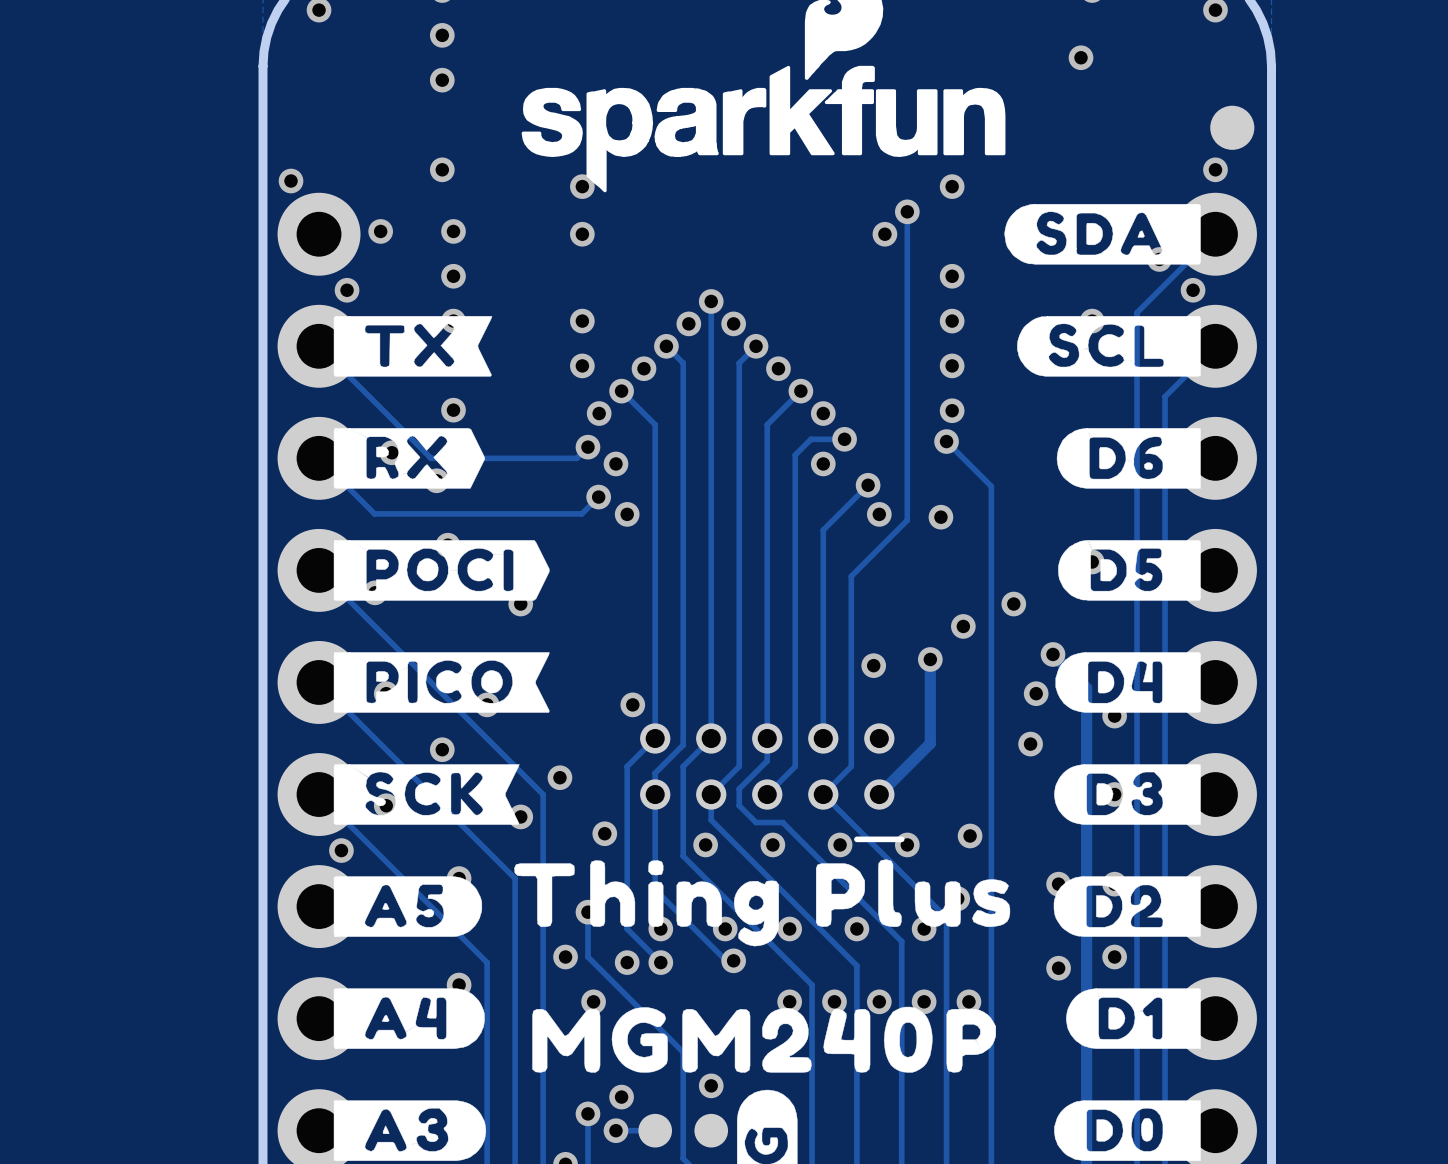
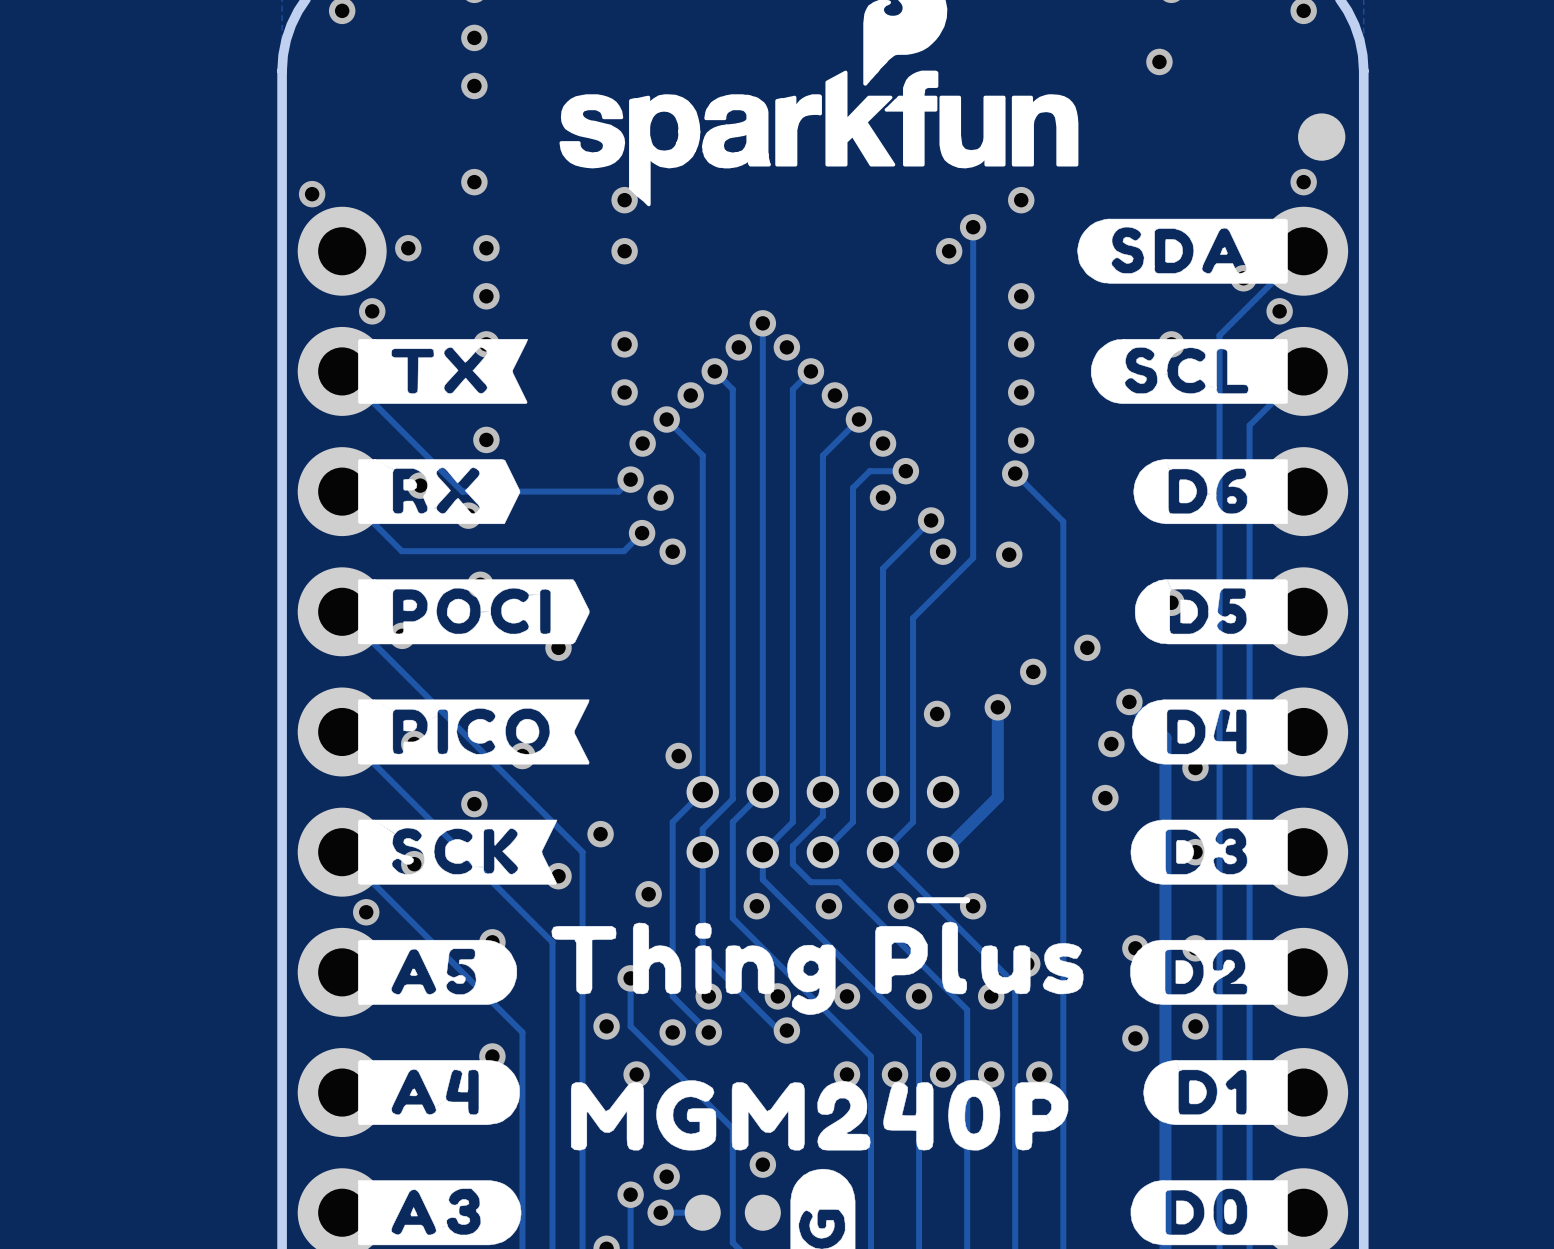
via: (970, 835) -> none

